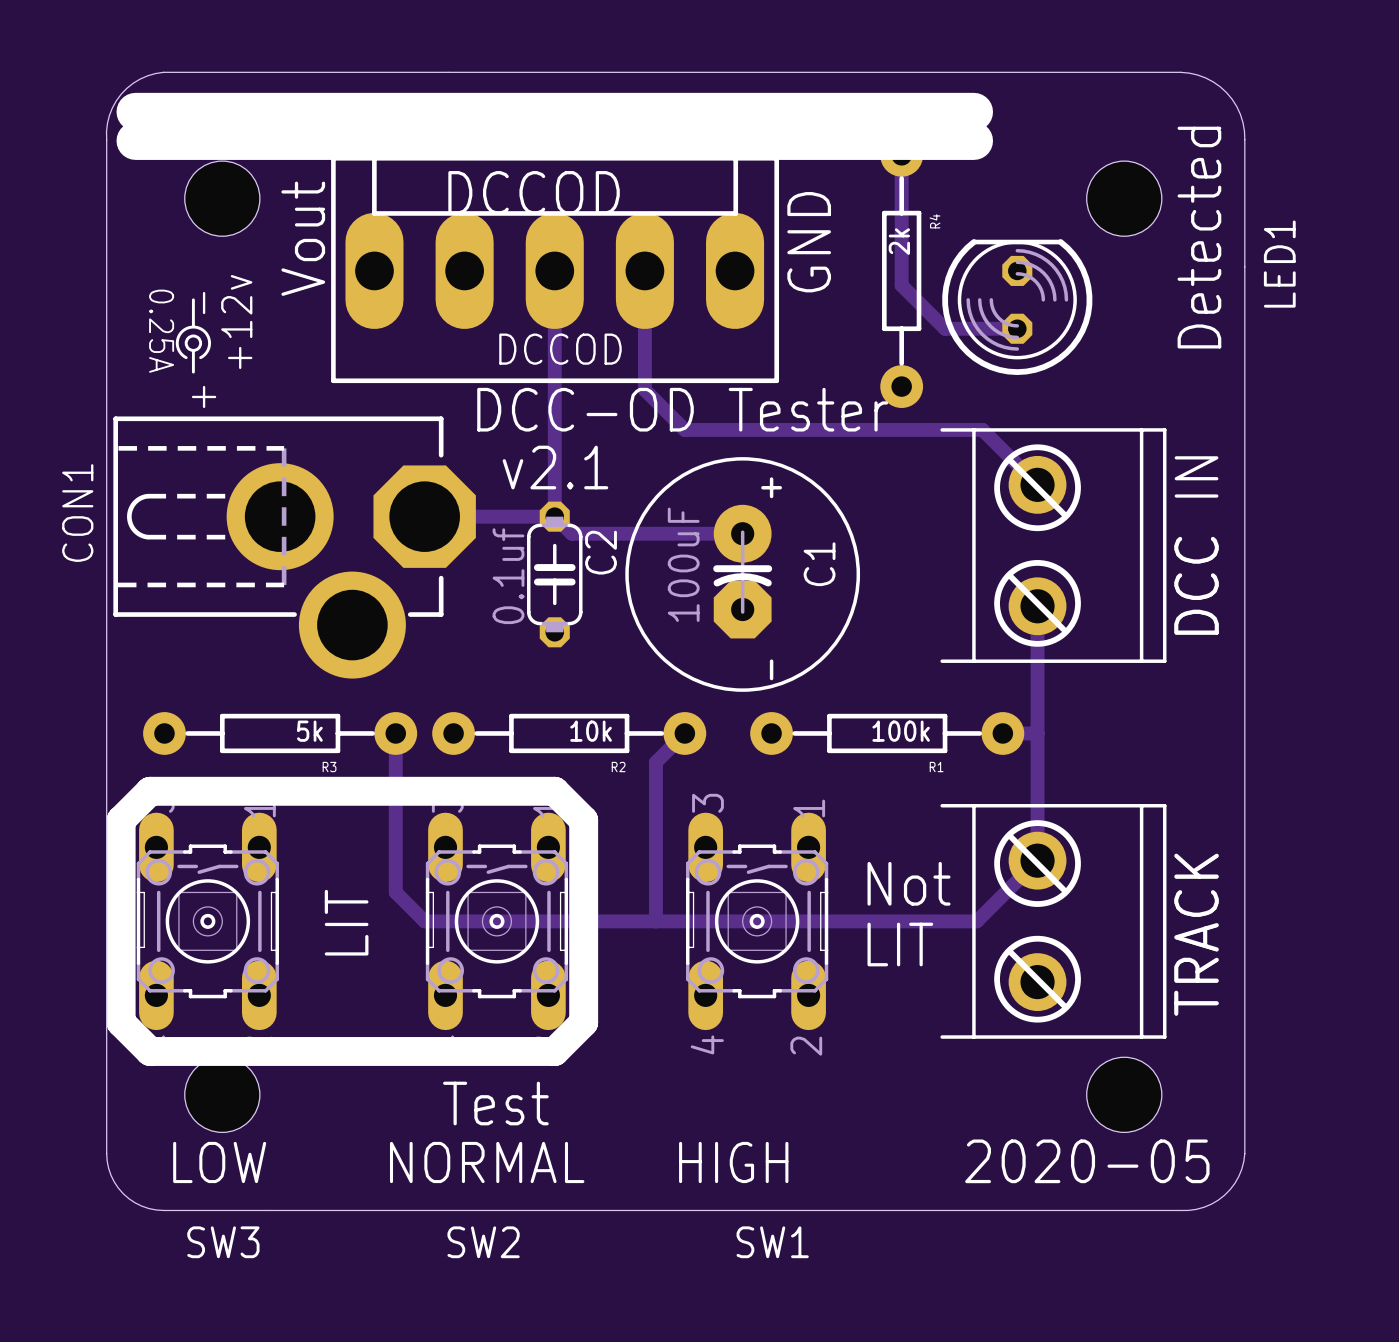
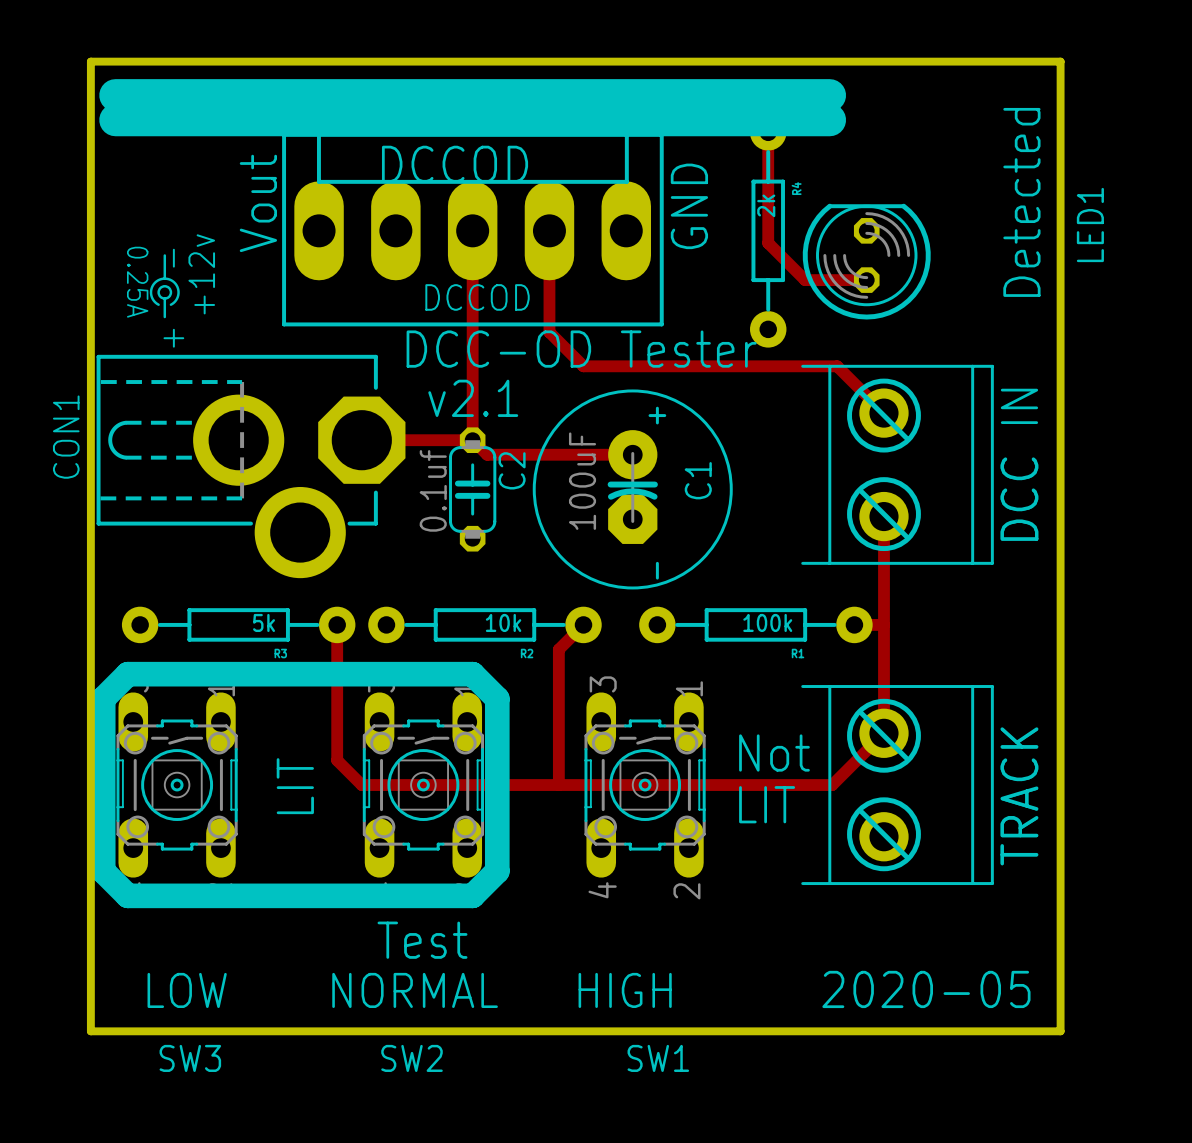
board edge: none -> (90, 61) (90, 1031) (1060, 1031) (1060, 61) (90, 61)
part: (675, 641) -> none

